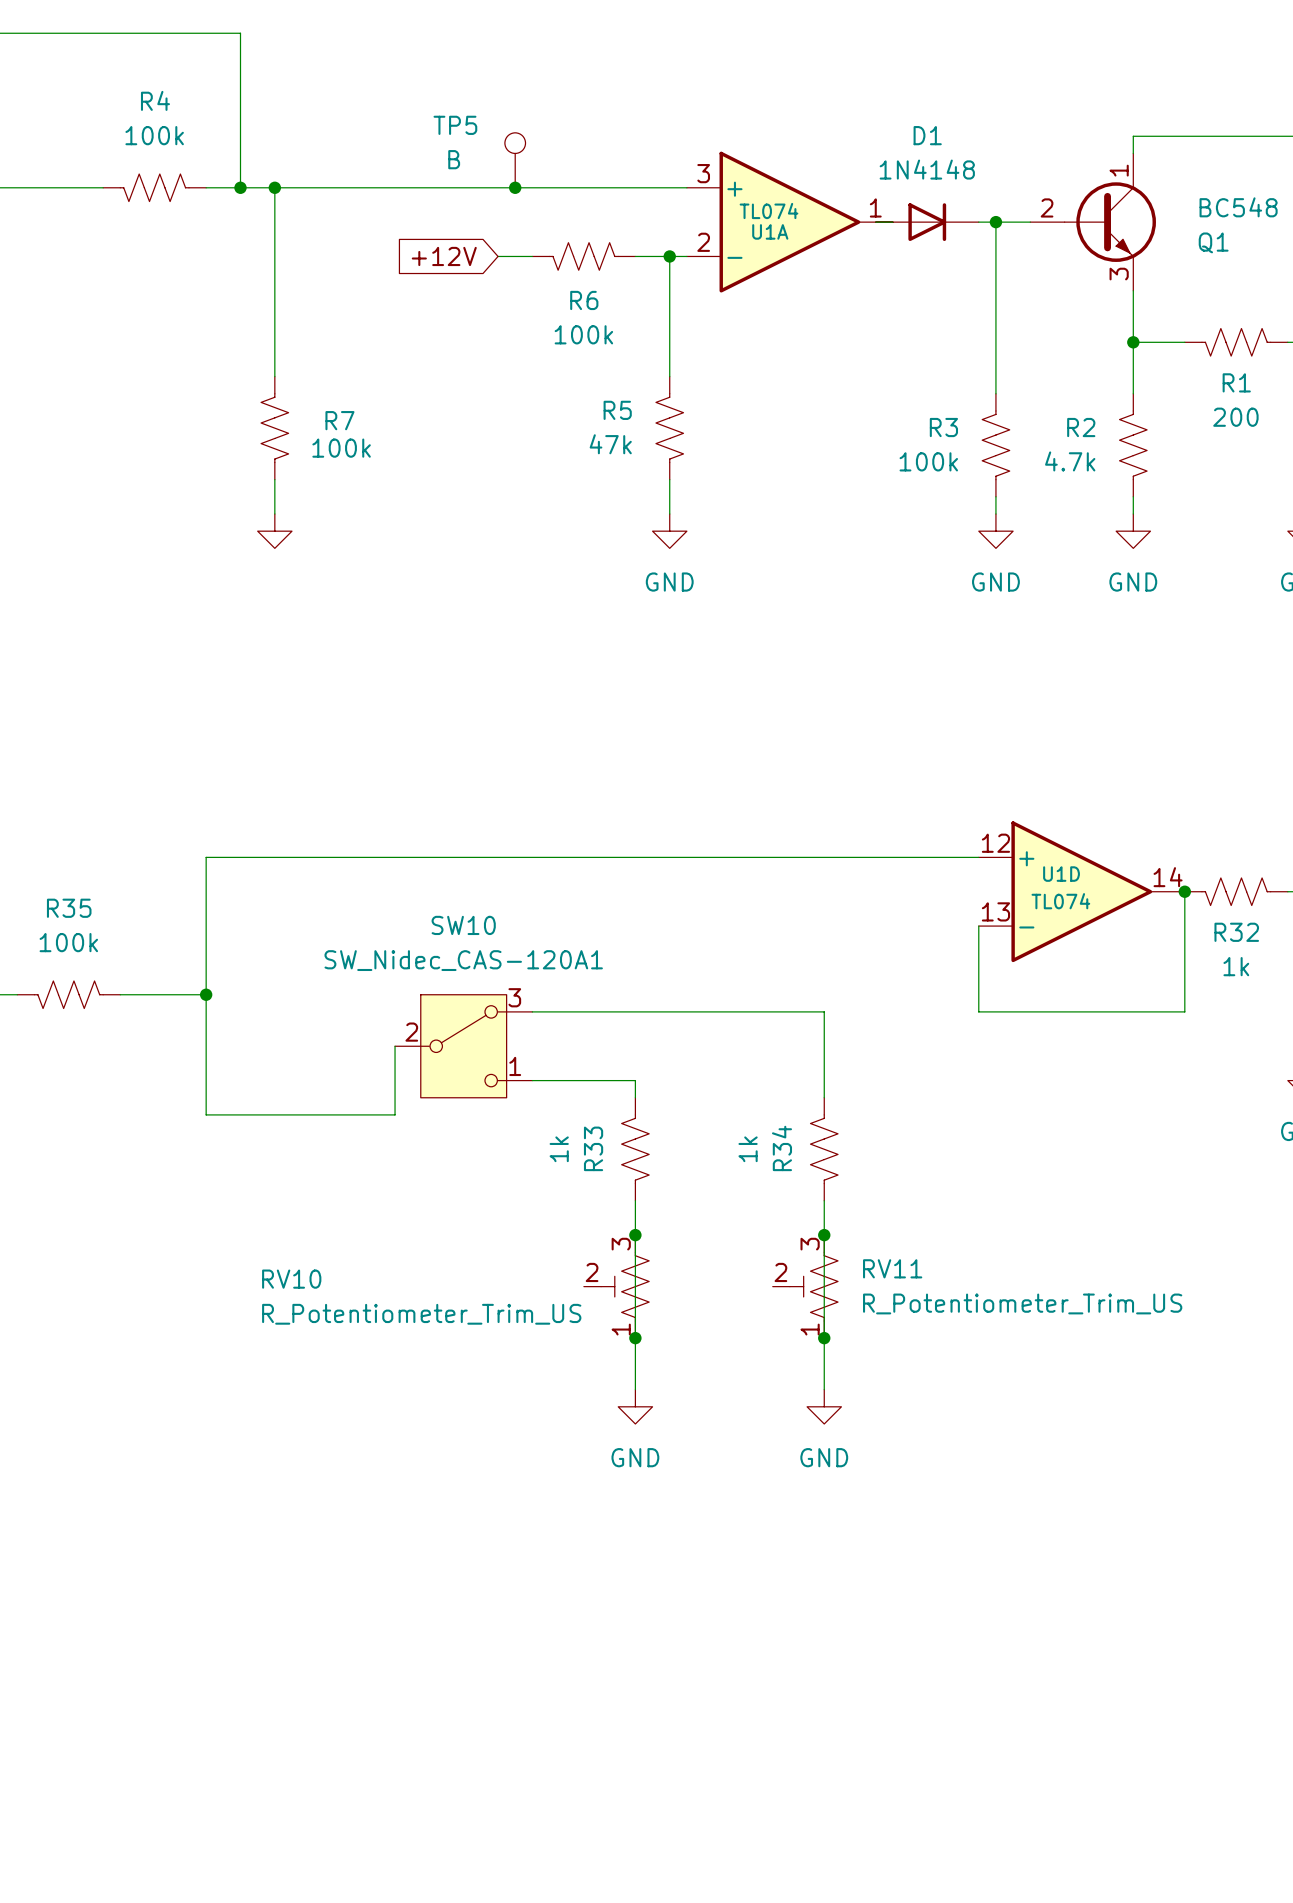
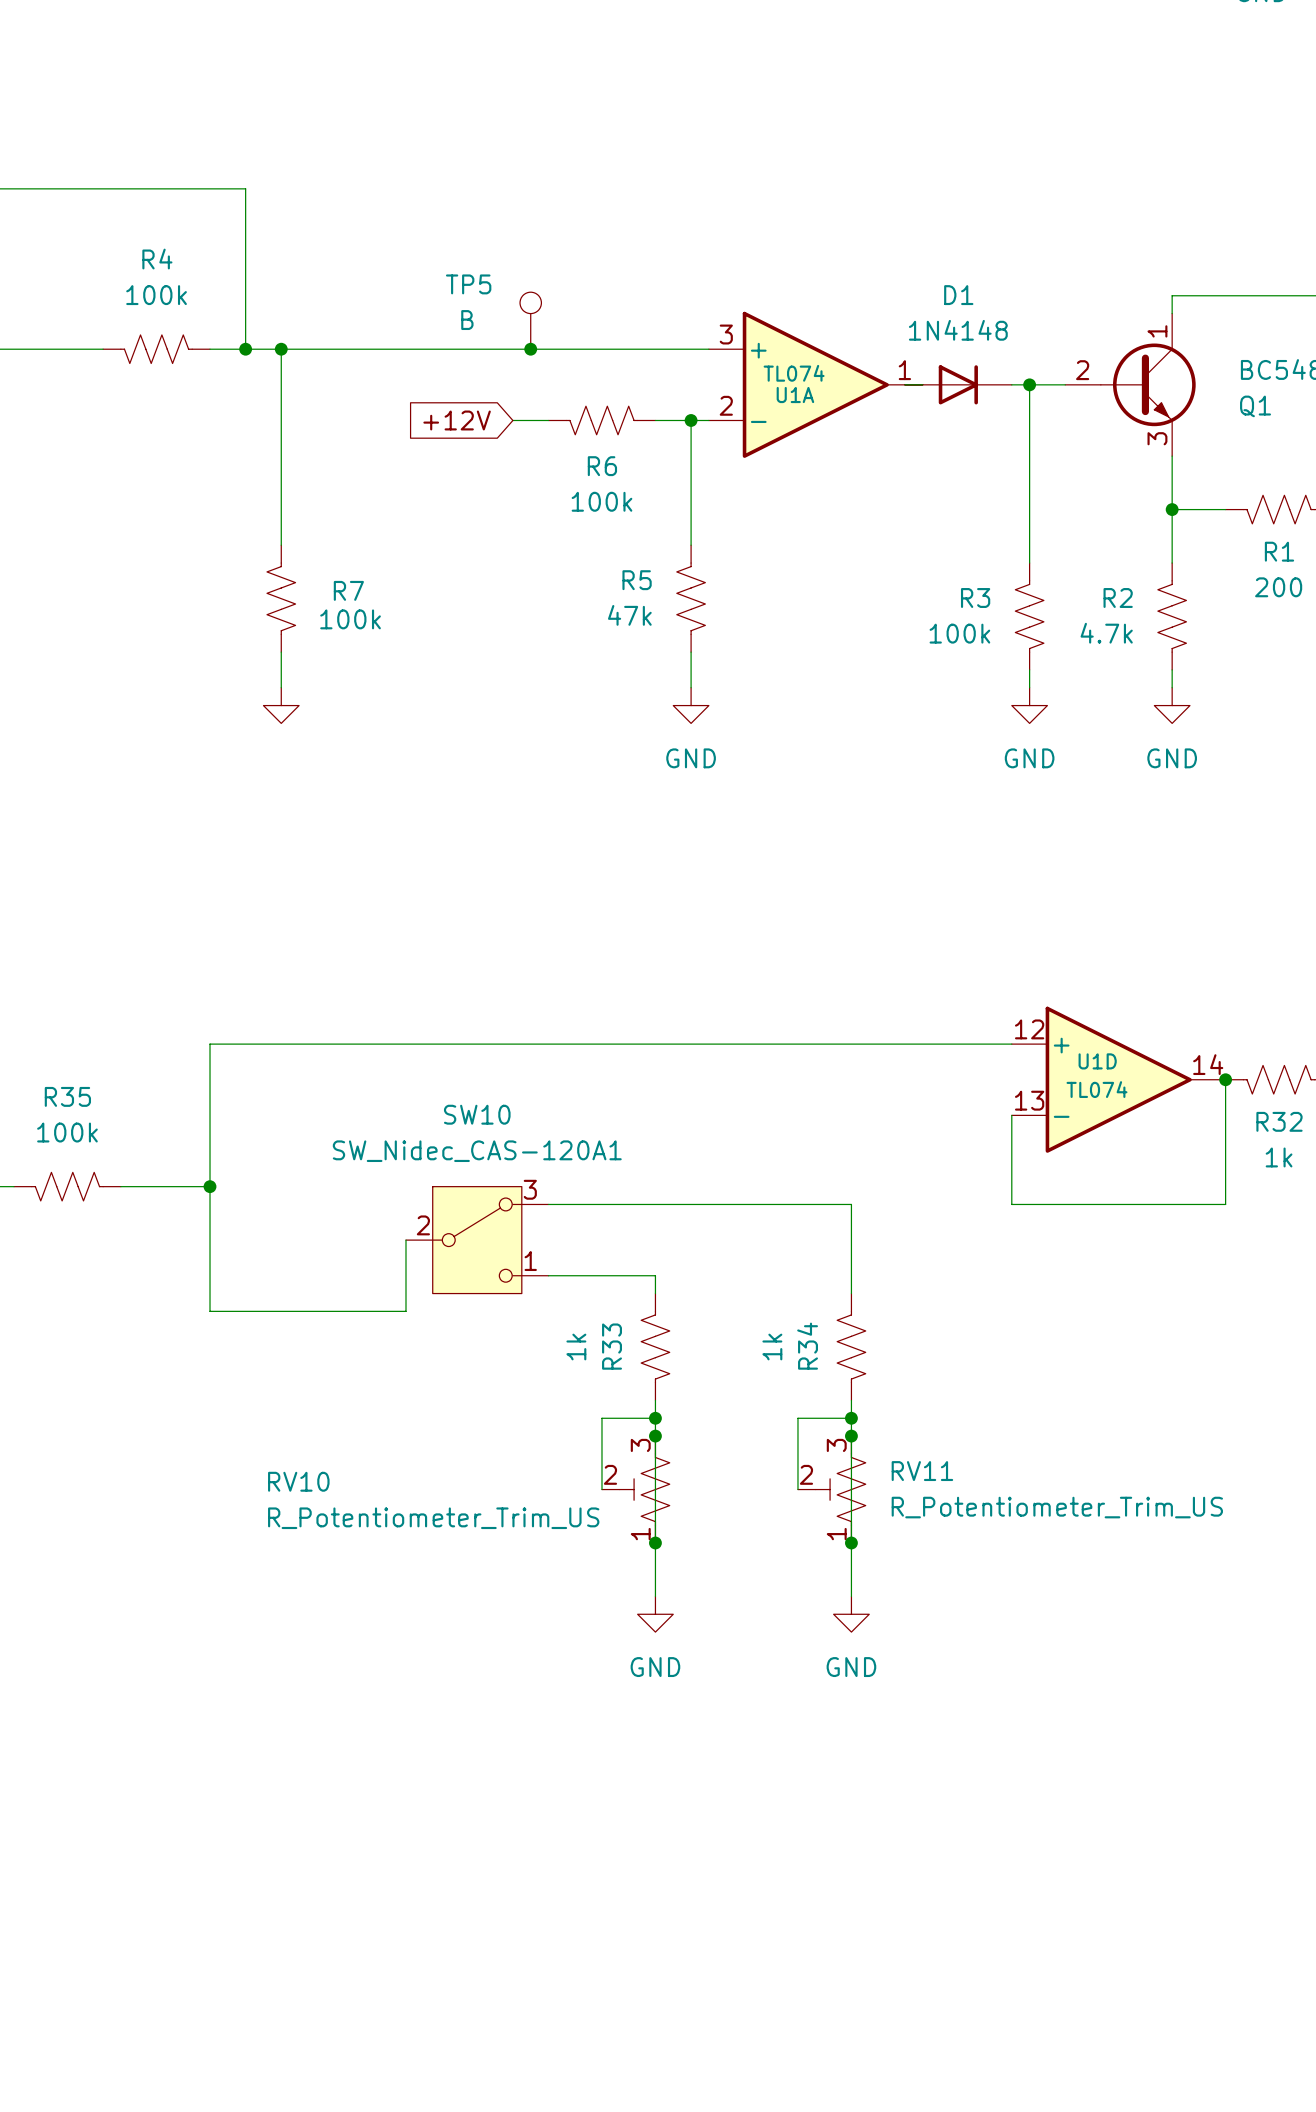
wire: none -> (655, 1418) (601, 1418) (601, 1489)
junction: none -> (655, 1418)
wire: none -> (851, 1418) (797, 1418) (797, 1489)
junction: none -> (851, 1418)

